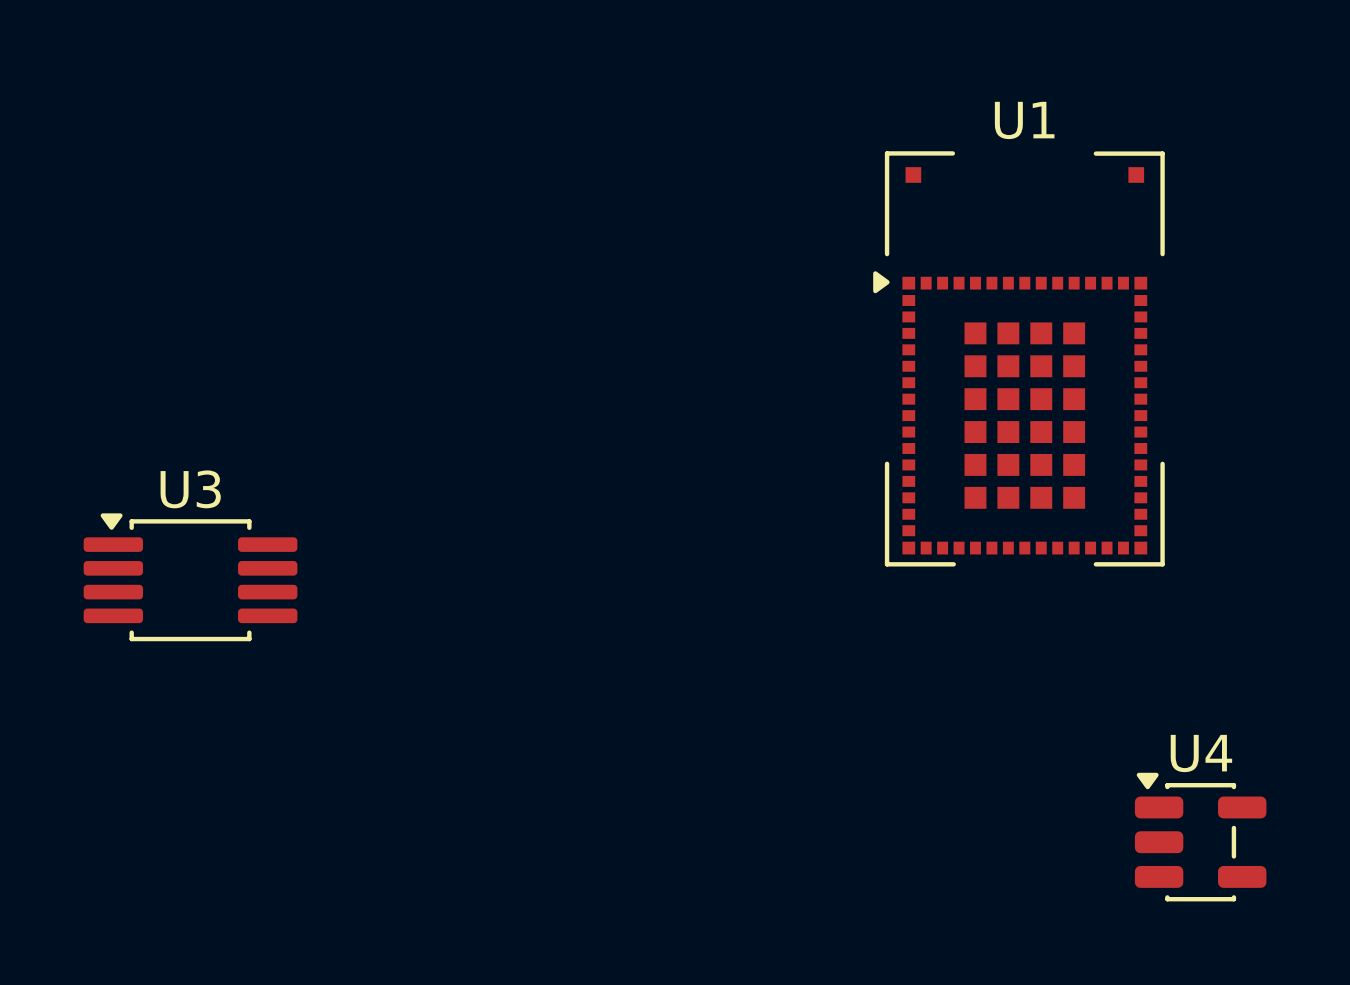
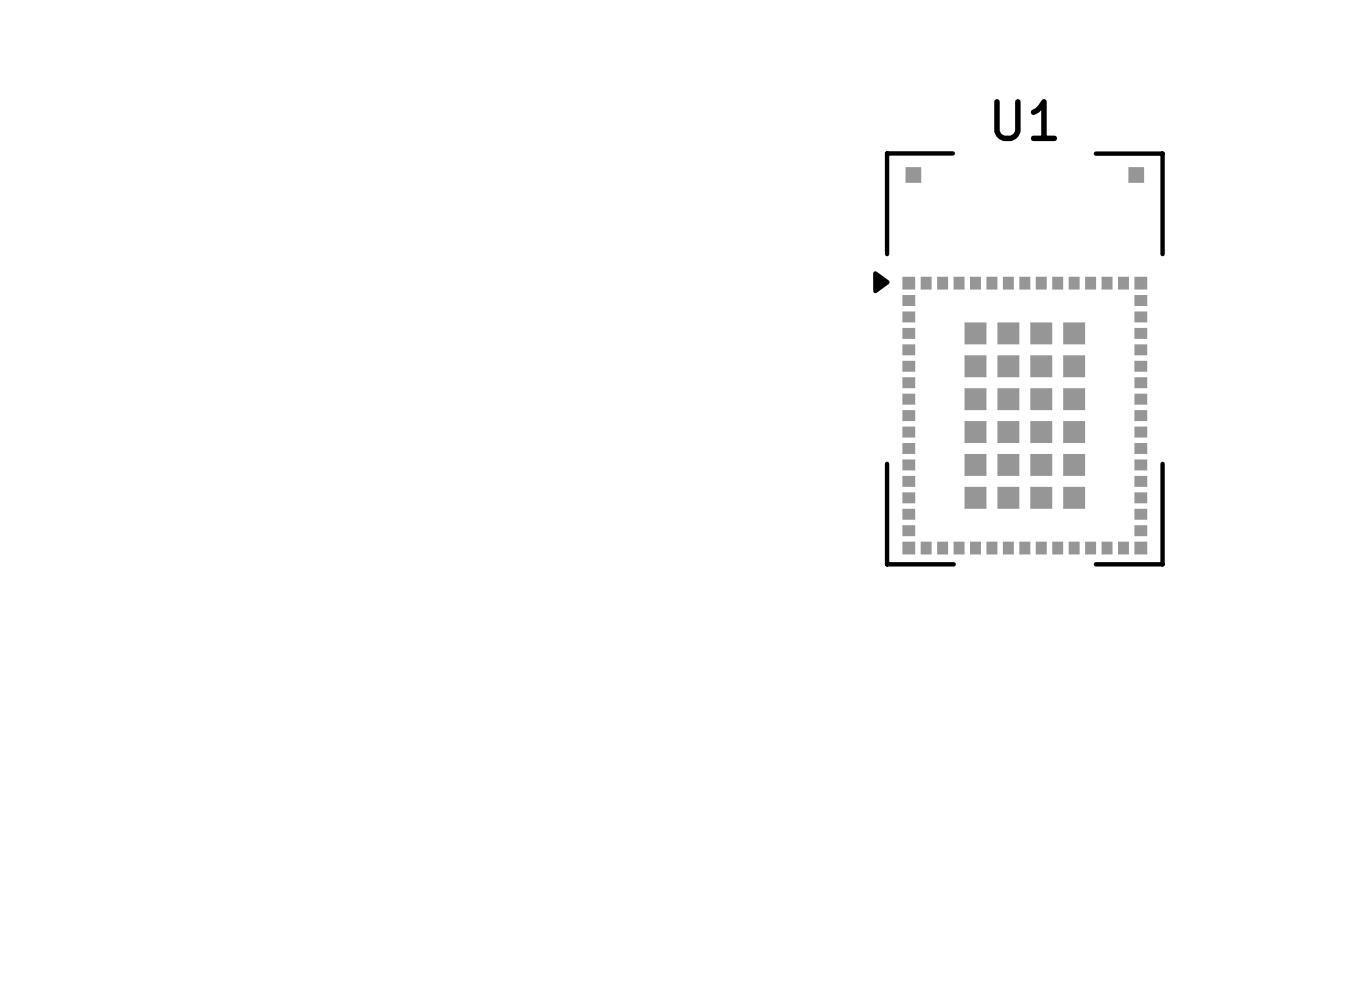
U3: (190, 577) -> none
U4: (1200, 837) -> none

